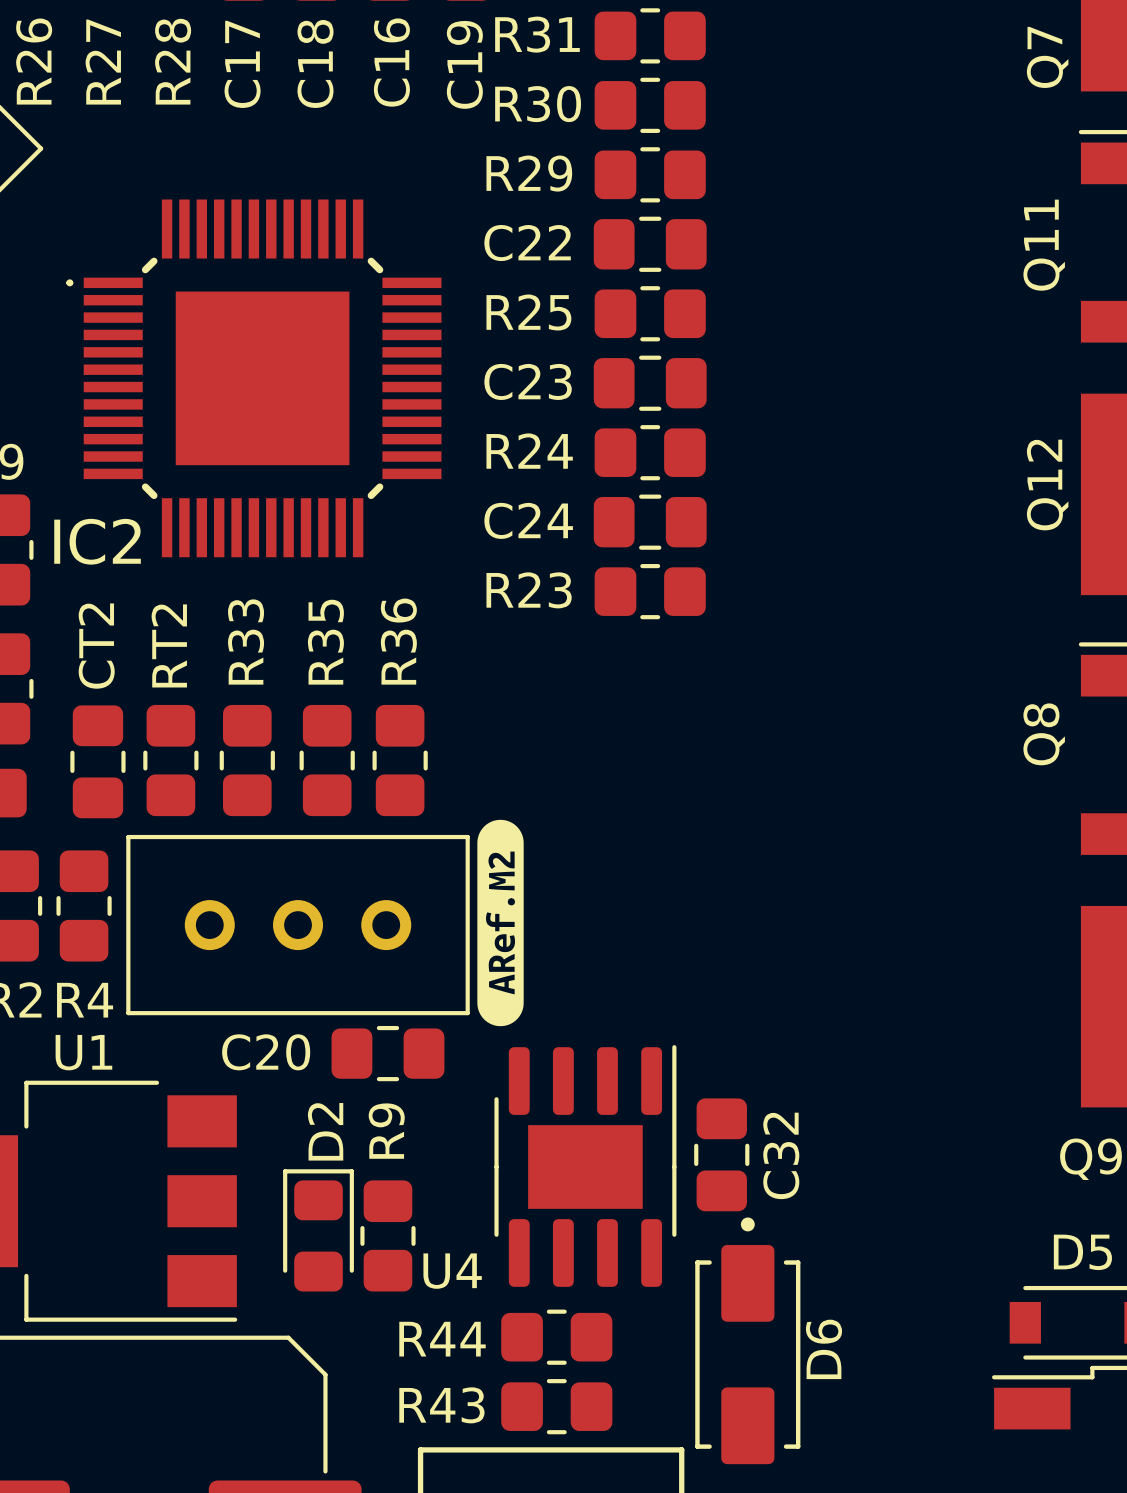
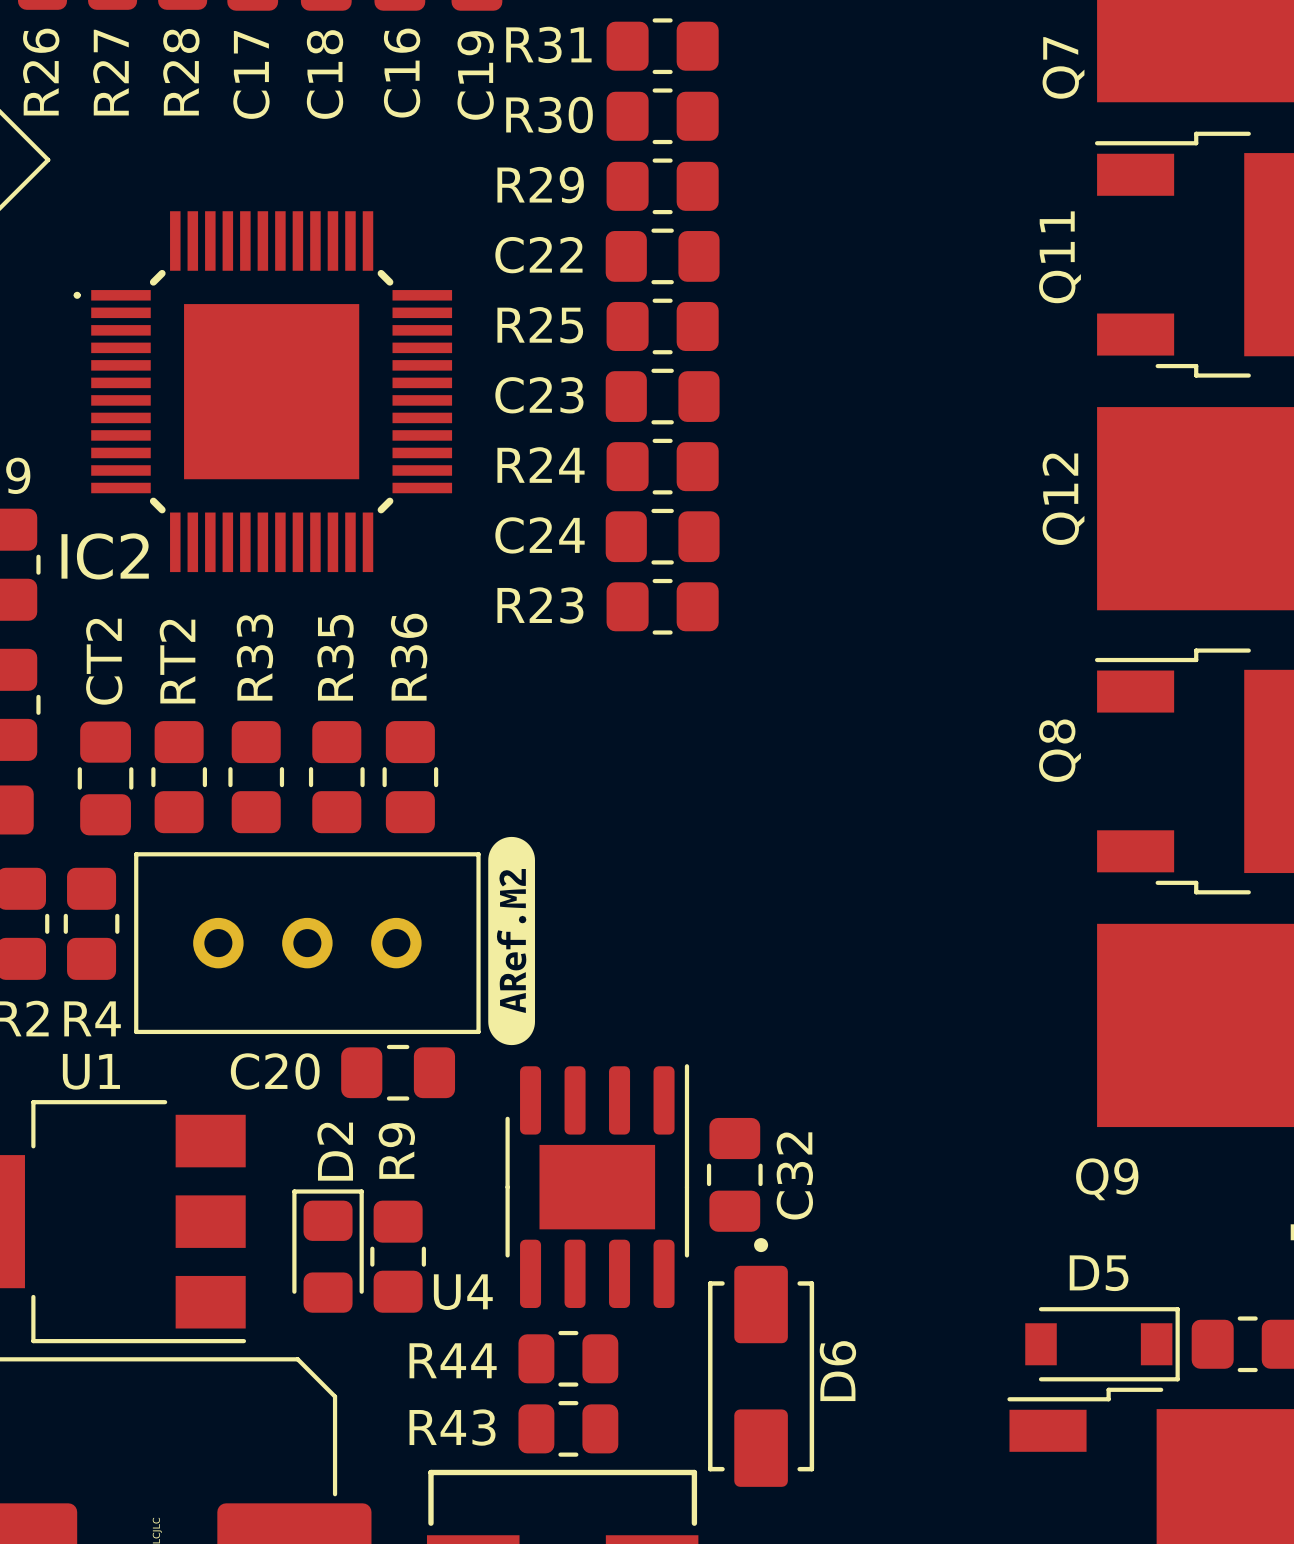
R44 footprint: [501, 1309, 613, 1365] -> [518, 1330, 619, 1387]
R43 footprint: [501, 1379, 613, 1435] -> [518, 1401, 619, 1457]

